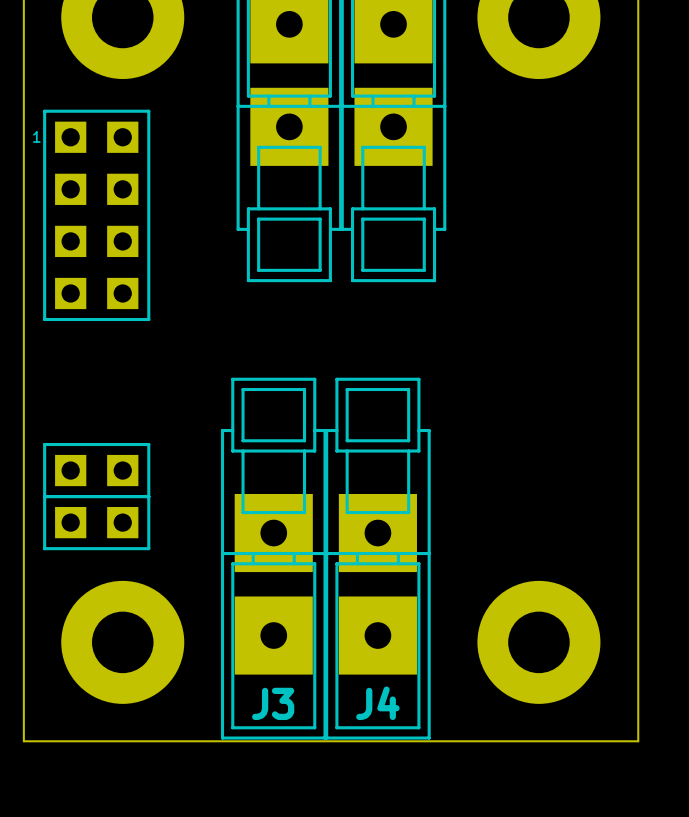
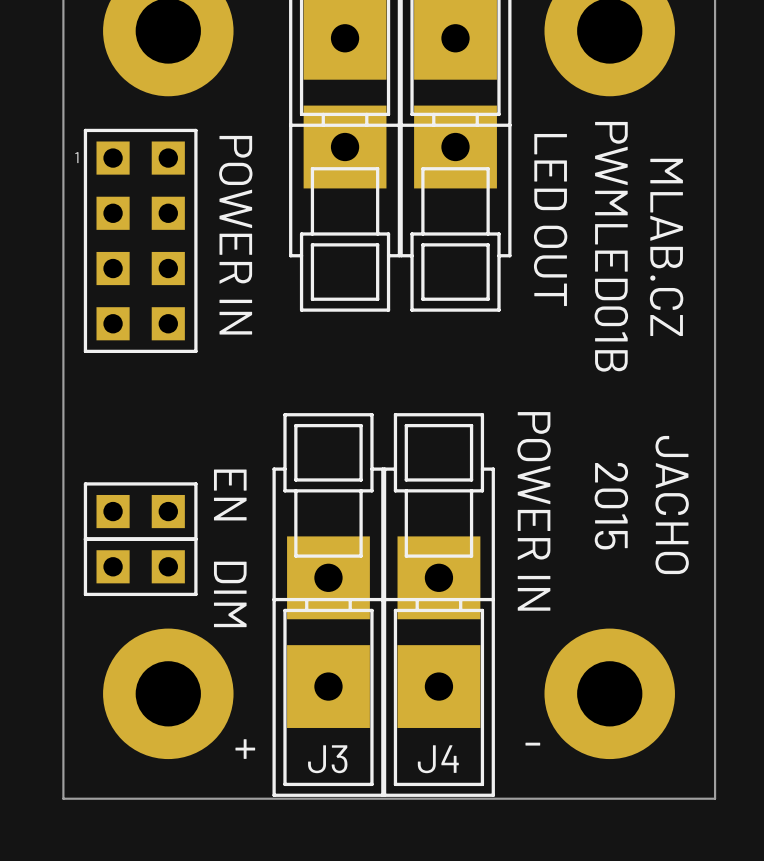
text: none -> LED OUT (550, 220)
text: none -> POWER IN (235, 235)
text: none -> PWMLED01B (611, 246)
text: none -> MLAB.CZ (666, 247)
text: none -> EN (230, 494)
text: none -> 2015 (611, 506)
text: none -> JACHO (672, 505)
text: none -> POWER IN (534, 511)
text: none -> DIM (230, 594)
text: none -> - (532, 744)
text: none -> + (245, 749)

